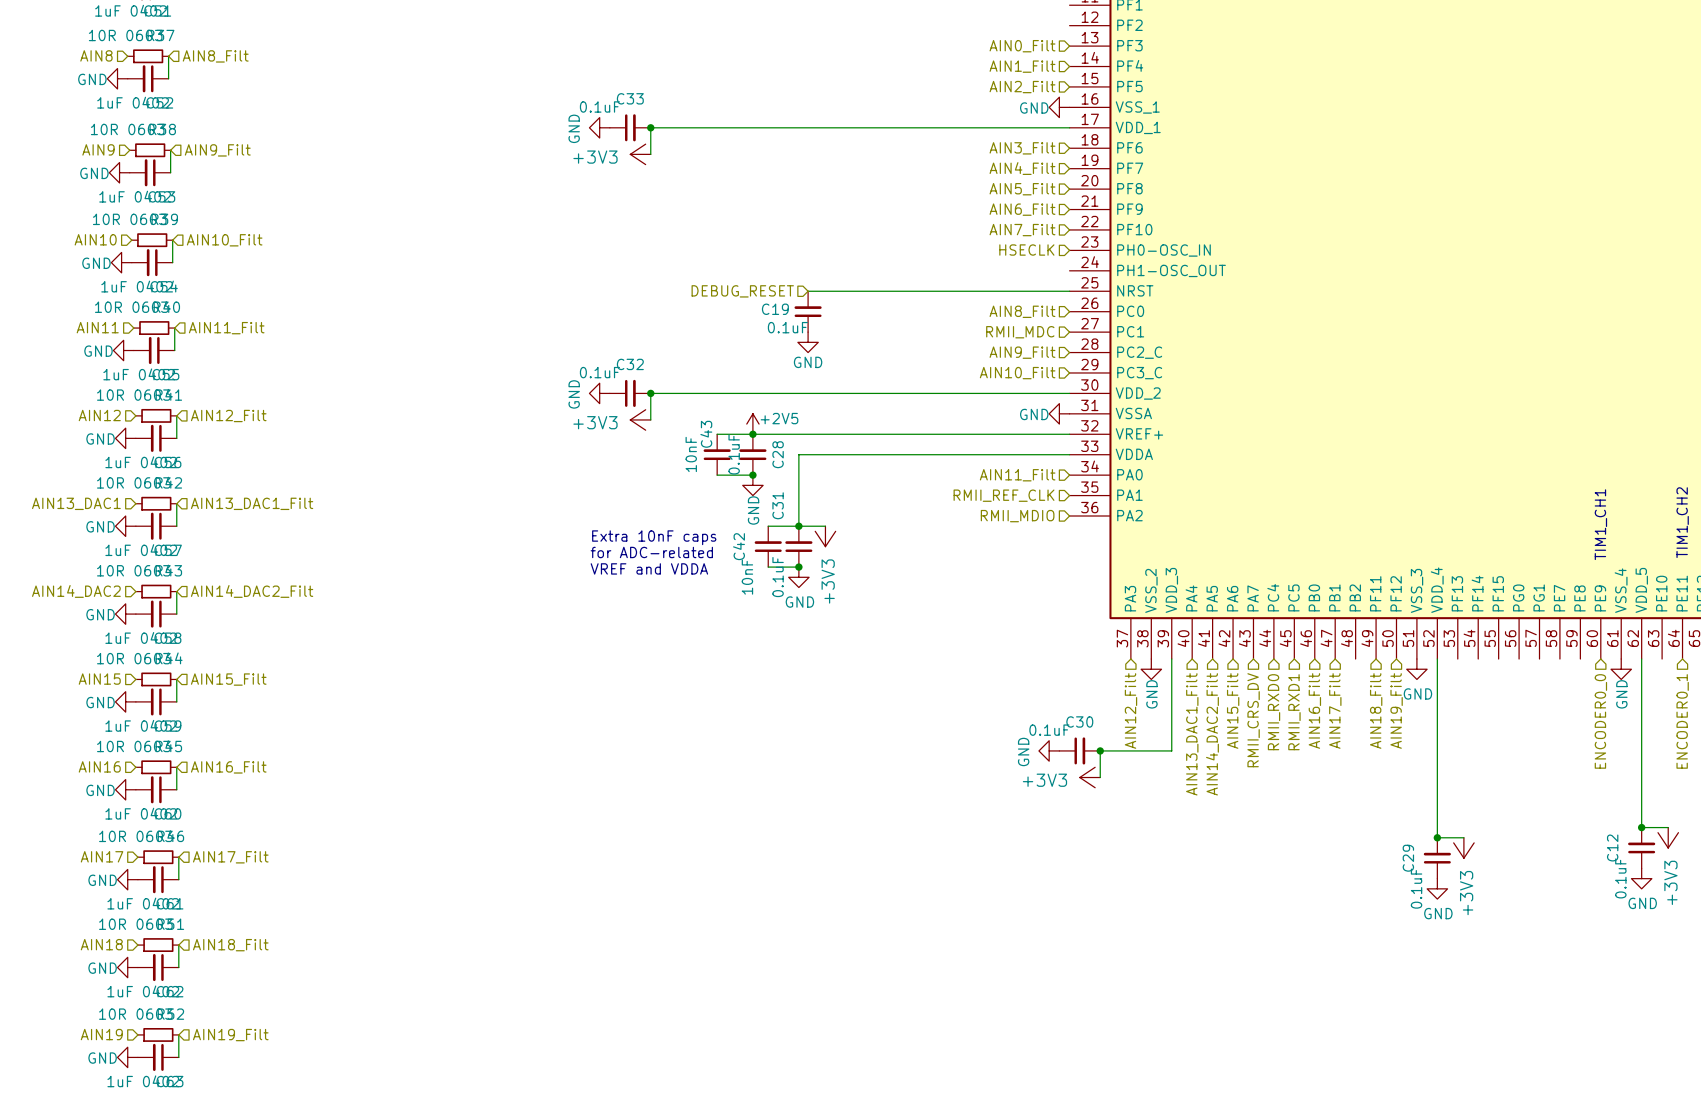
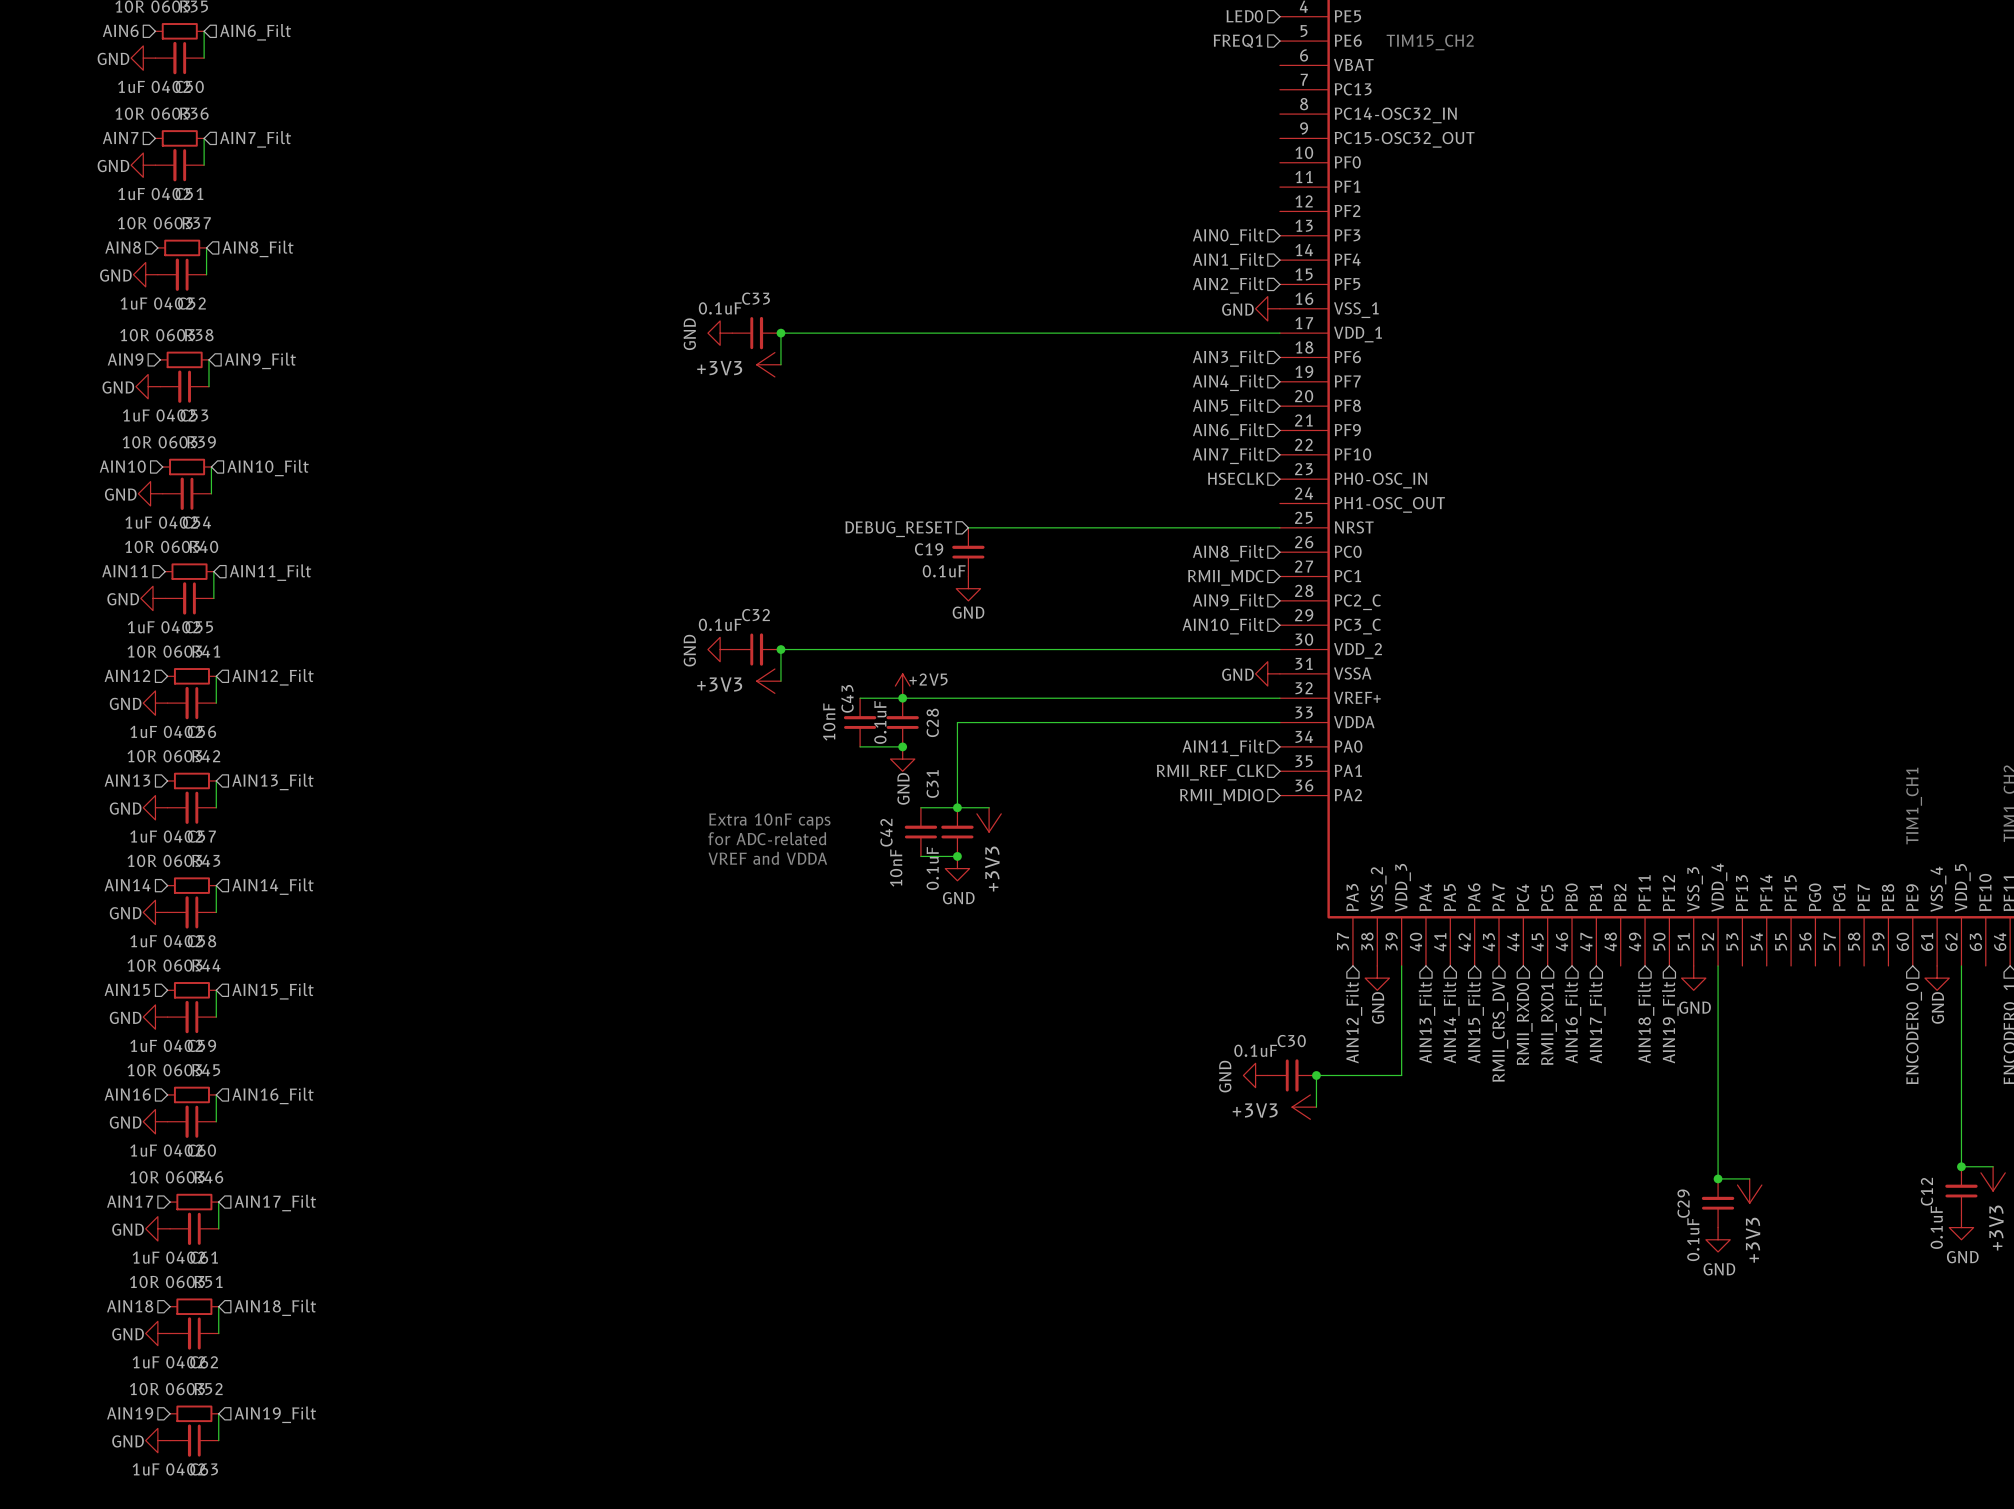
hierarchical label: AIN13_DAC1 (76, 503) -> AIN13 (127, 780)
hierarchical label: AIN13_DAC1_Filt (252, 503) -> AIN13_Filt (272, 781)
hierarchical label: AIN14_DAC2 (76, 591) -> AIN14 (127, 885)
hierarchical label: AIN14_DAC2_Filt (252, 591) -> AIN14_Filt (272, 886)
hierarchical label: AIN13_DAC1_Filt (1192, 734) -> AIN13_Filt (1426, 1022)
hierarchical label: AIN14_DAC2_Filt (1212, 734) -> AIN14_Filt (1451, 1022)

